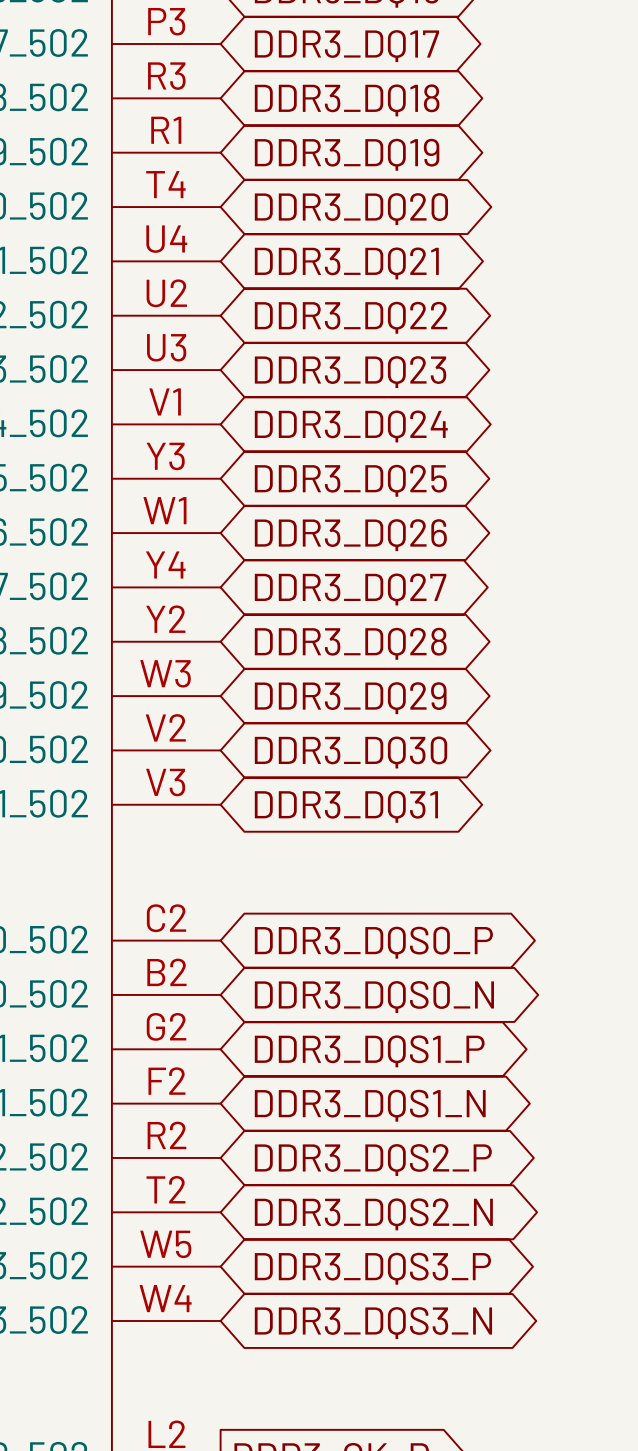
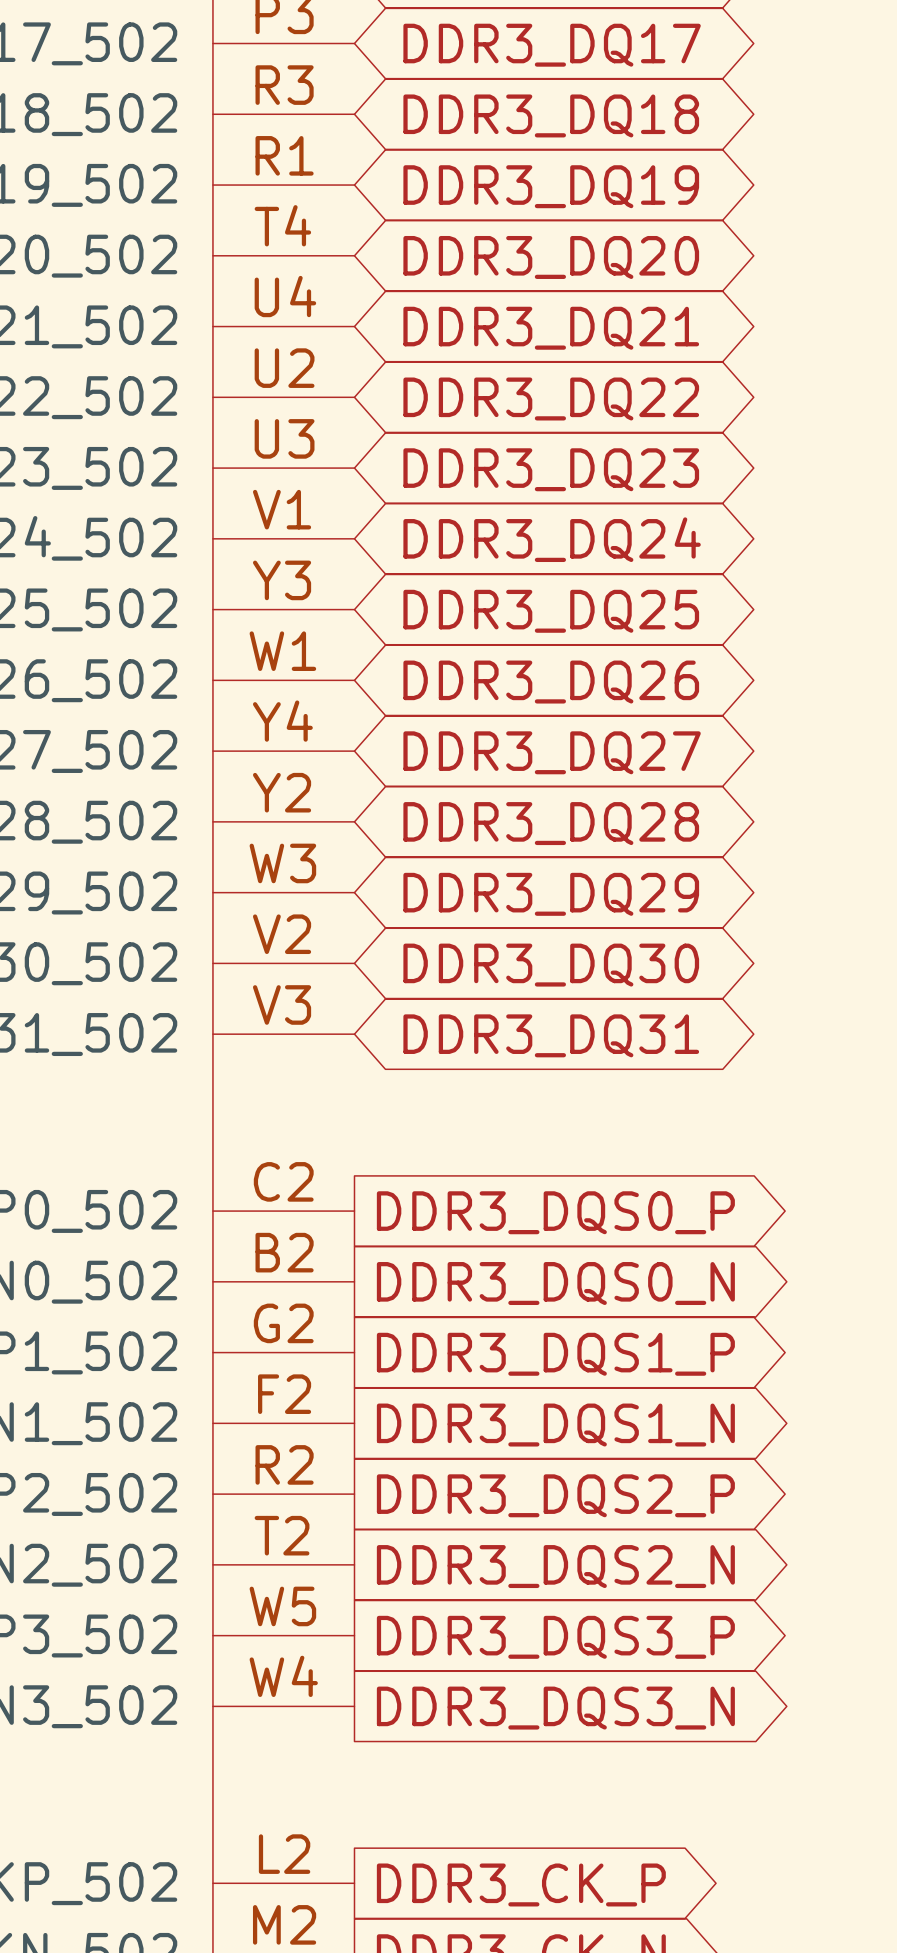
global label shape: bidirectional (373, 942) -> output (555, 1212)
global label shape: bidirectional (374, 997) -> output (555, 1283)
global label shape: bidirectional (369, 1051) -> output (555, 1354)
global label shape: bidirectional (370, 1105) -> output (555, 1425)
global label shape: bidirectional (373, 1160) -> output (555, 1495)
global label shape: bidirectional (373, 1214) -> output (555, 1566)
global label shape: bidirectional (372, 1268) -> output (555, 1637)
global label shape: bidirectional (373, 1323) -> output (555, 1708)

